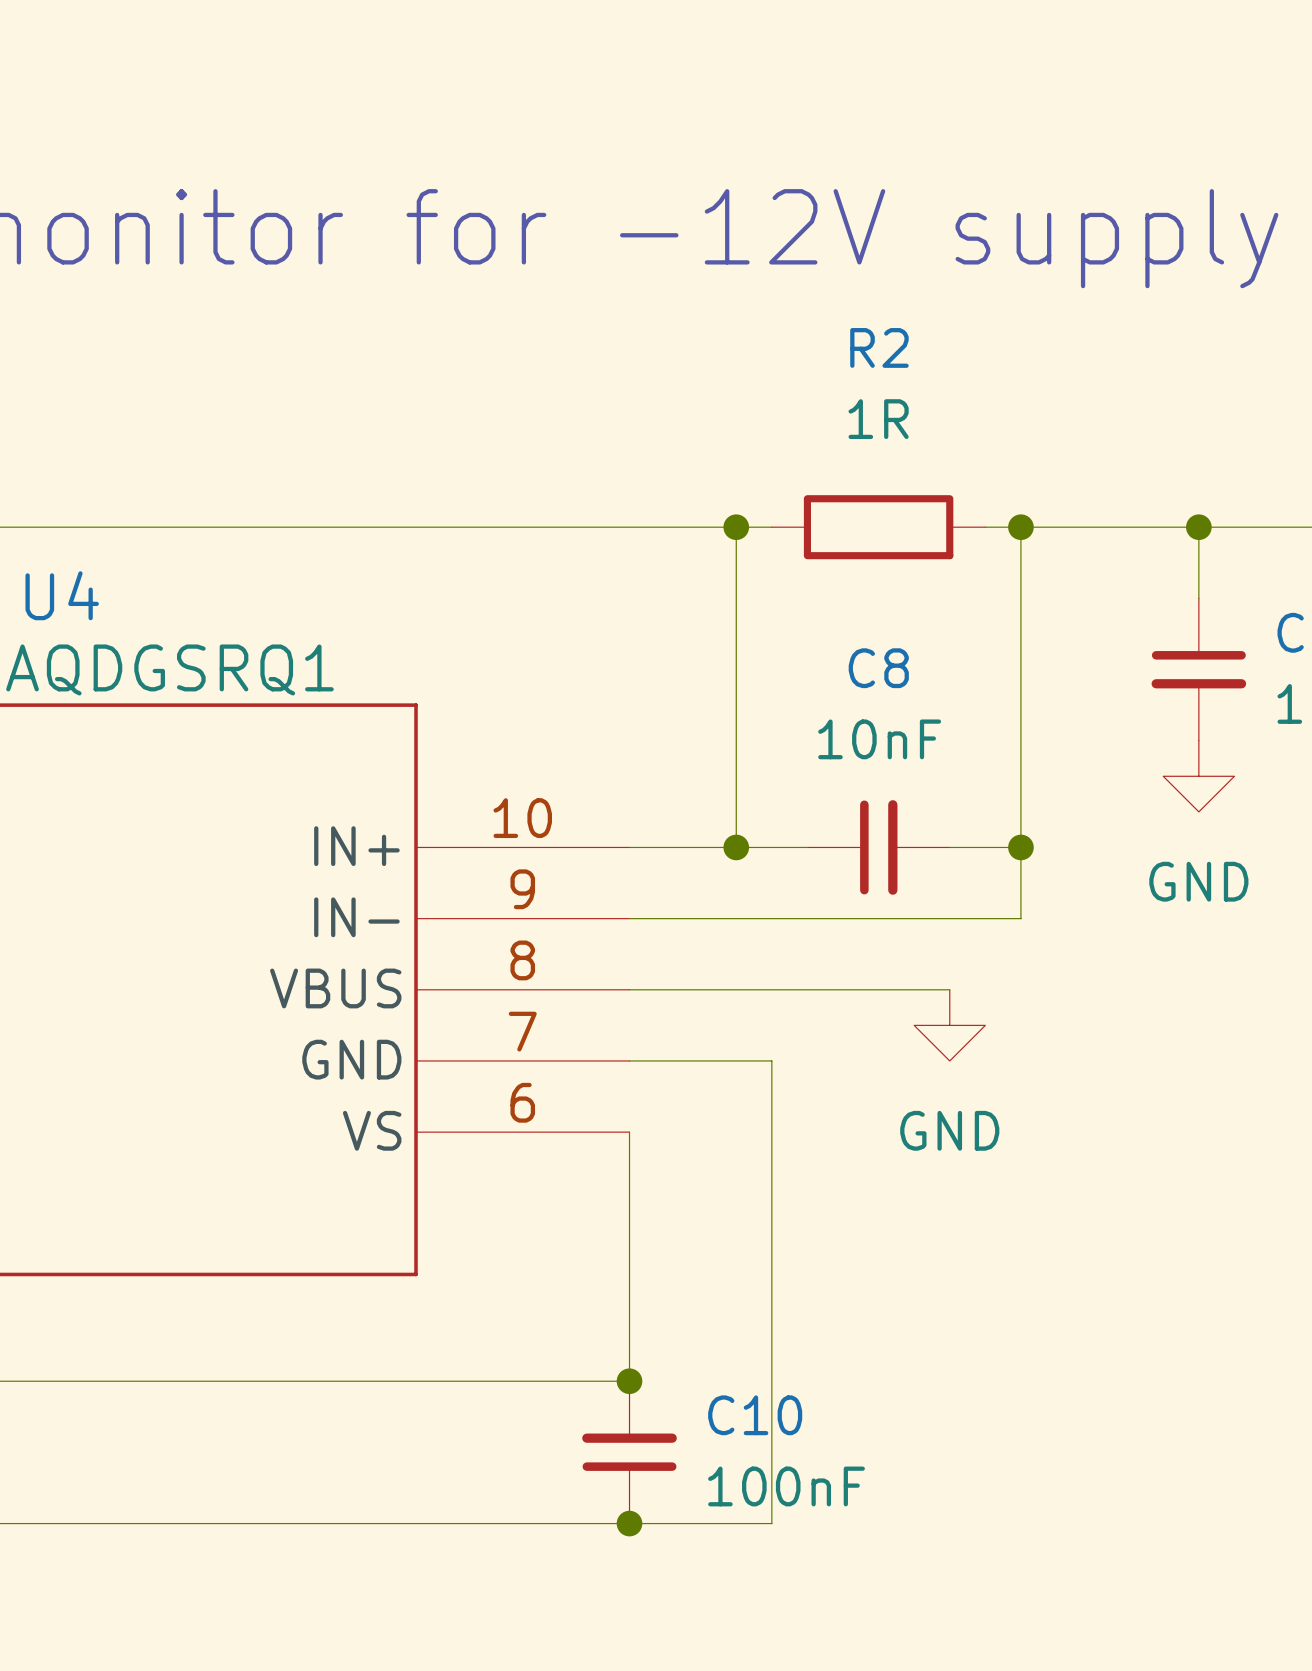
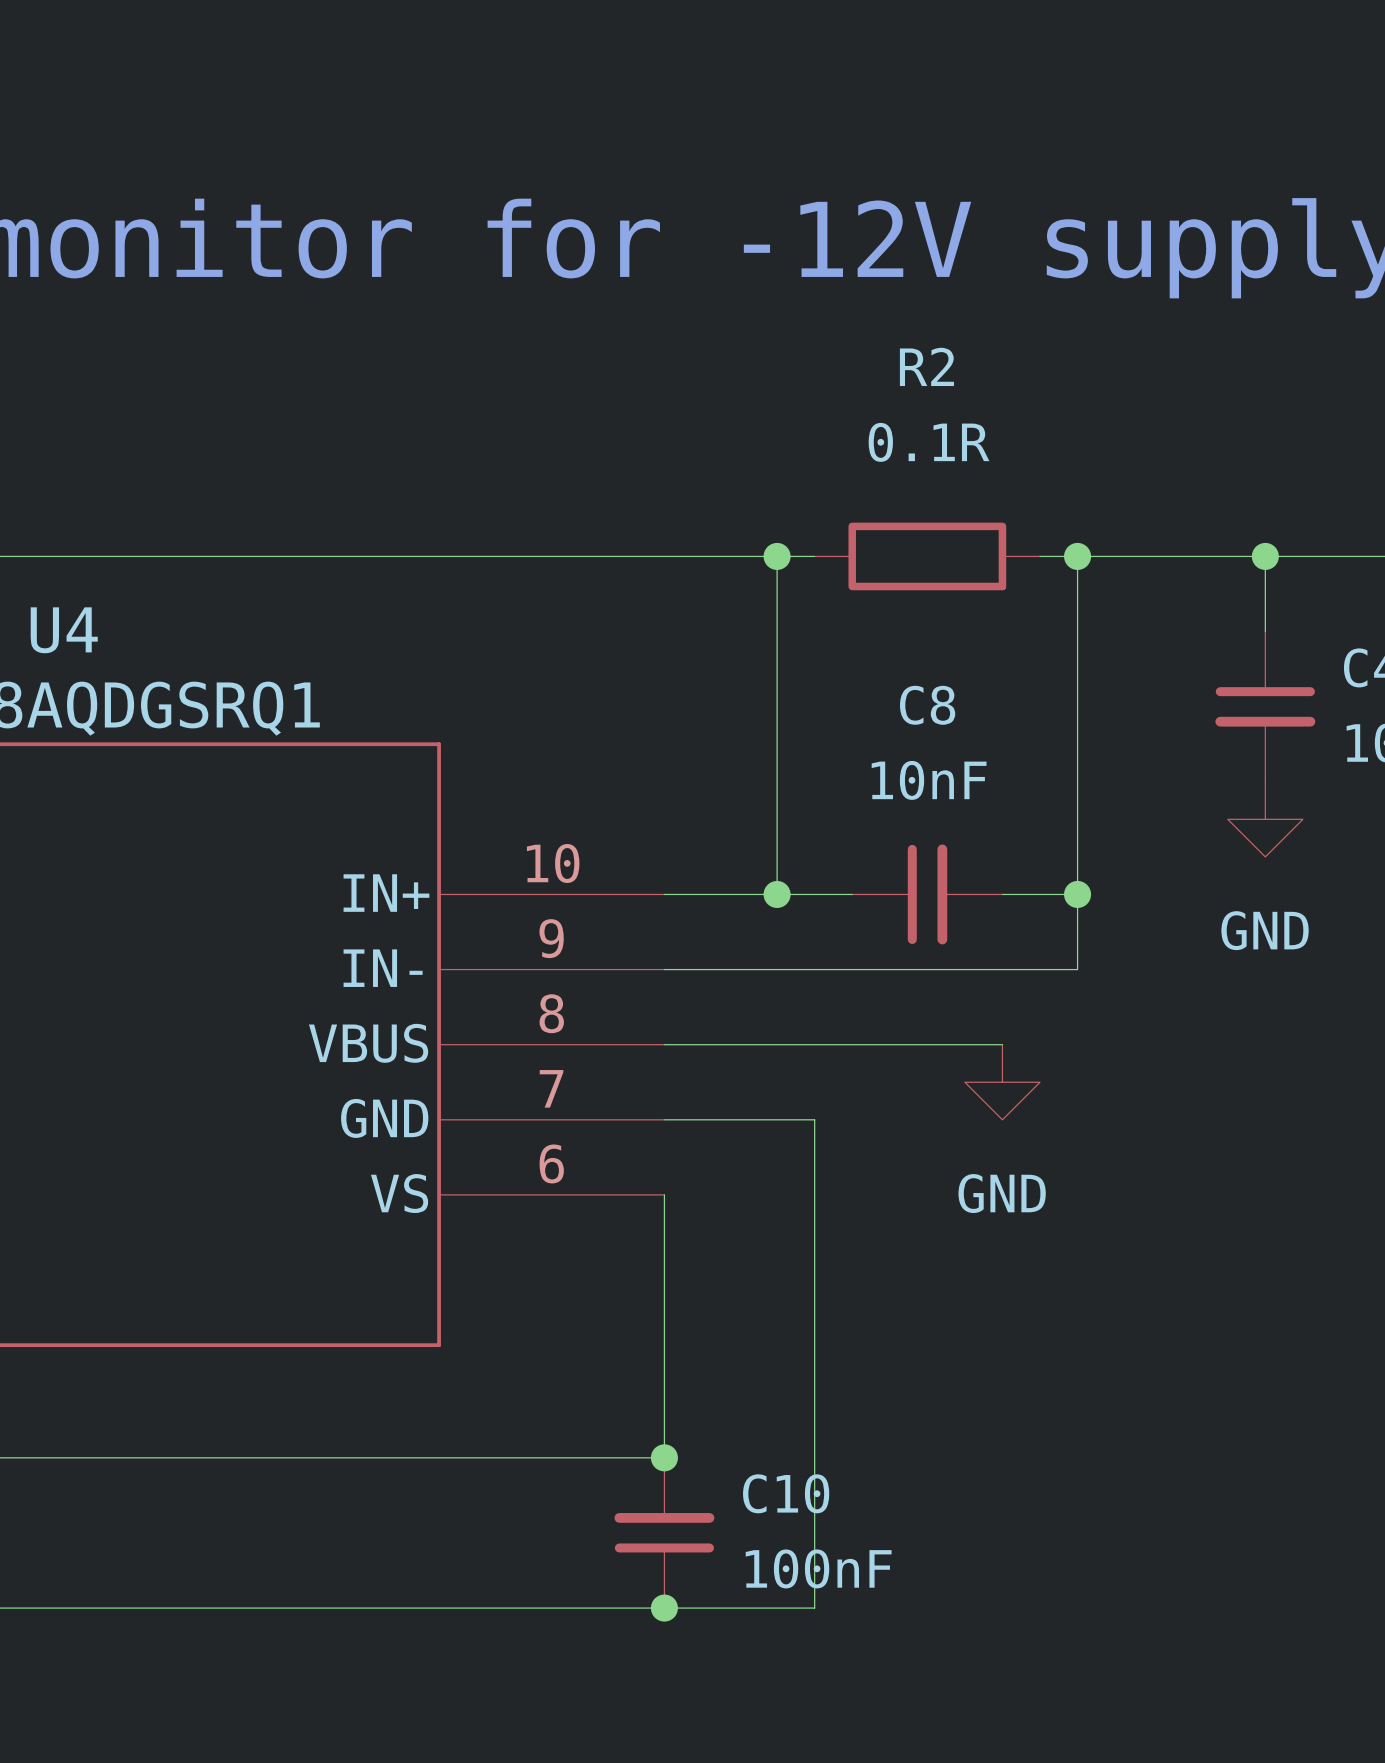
R2 value: 1R (878, 419) -> 0.1R (929, 442)

